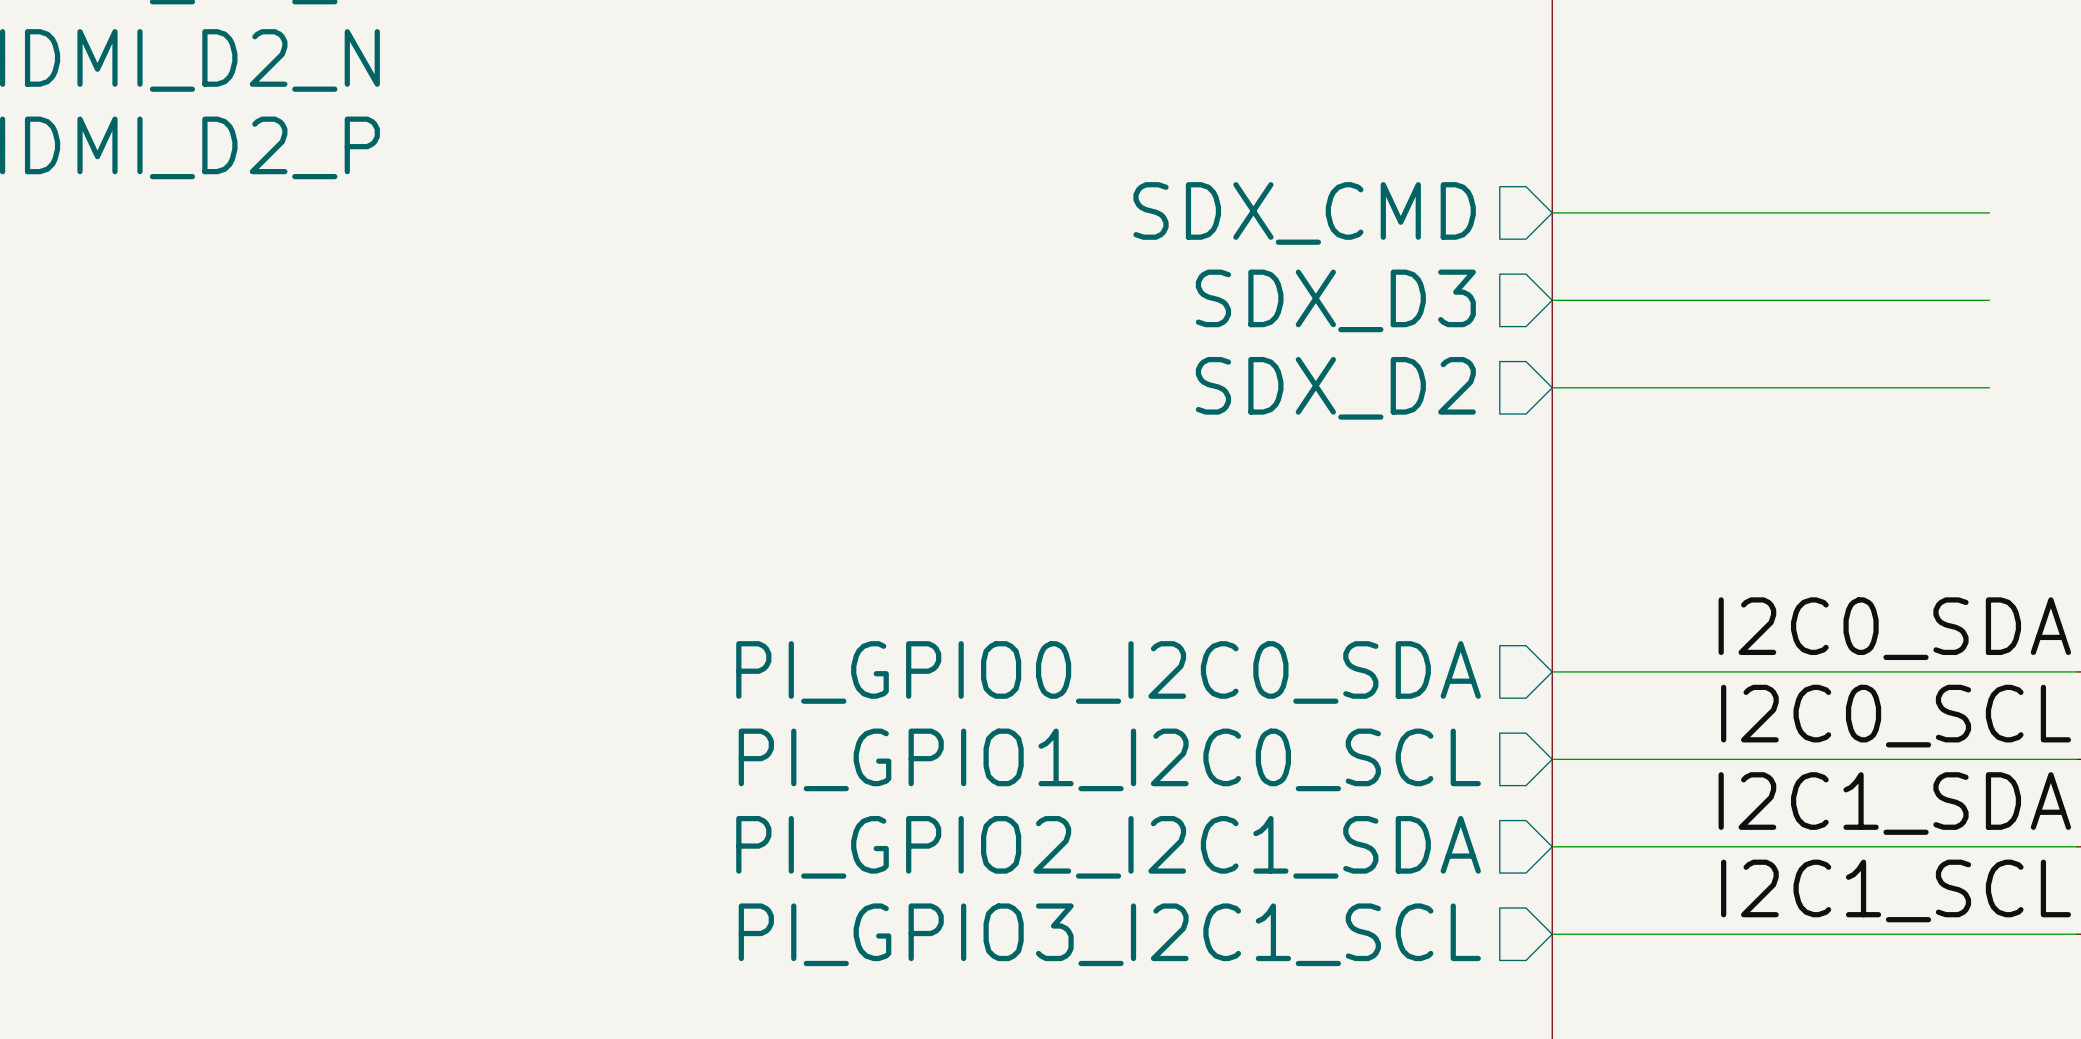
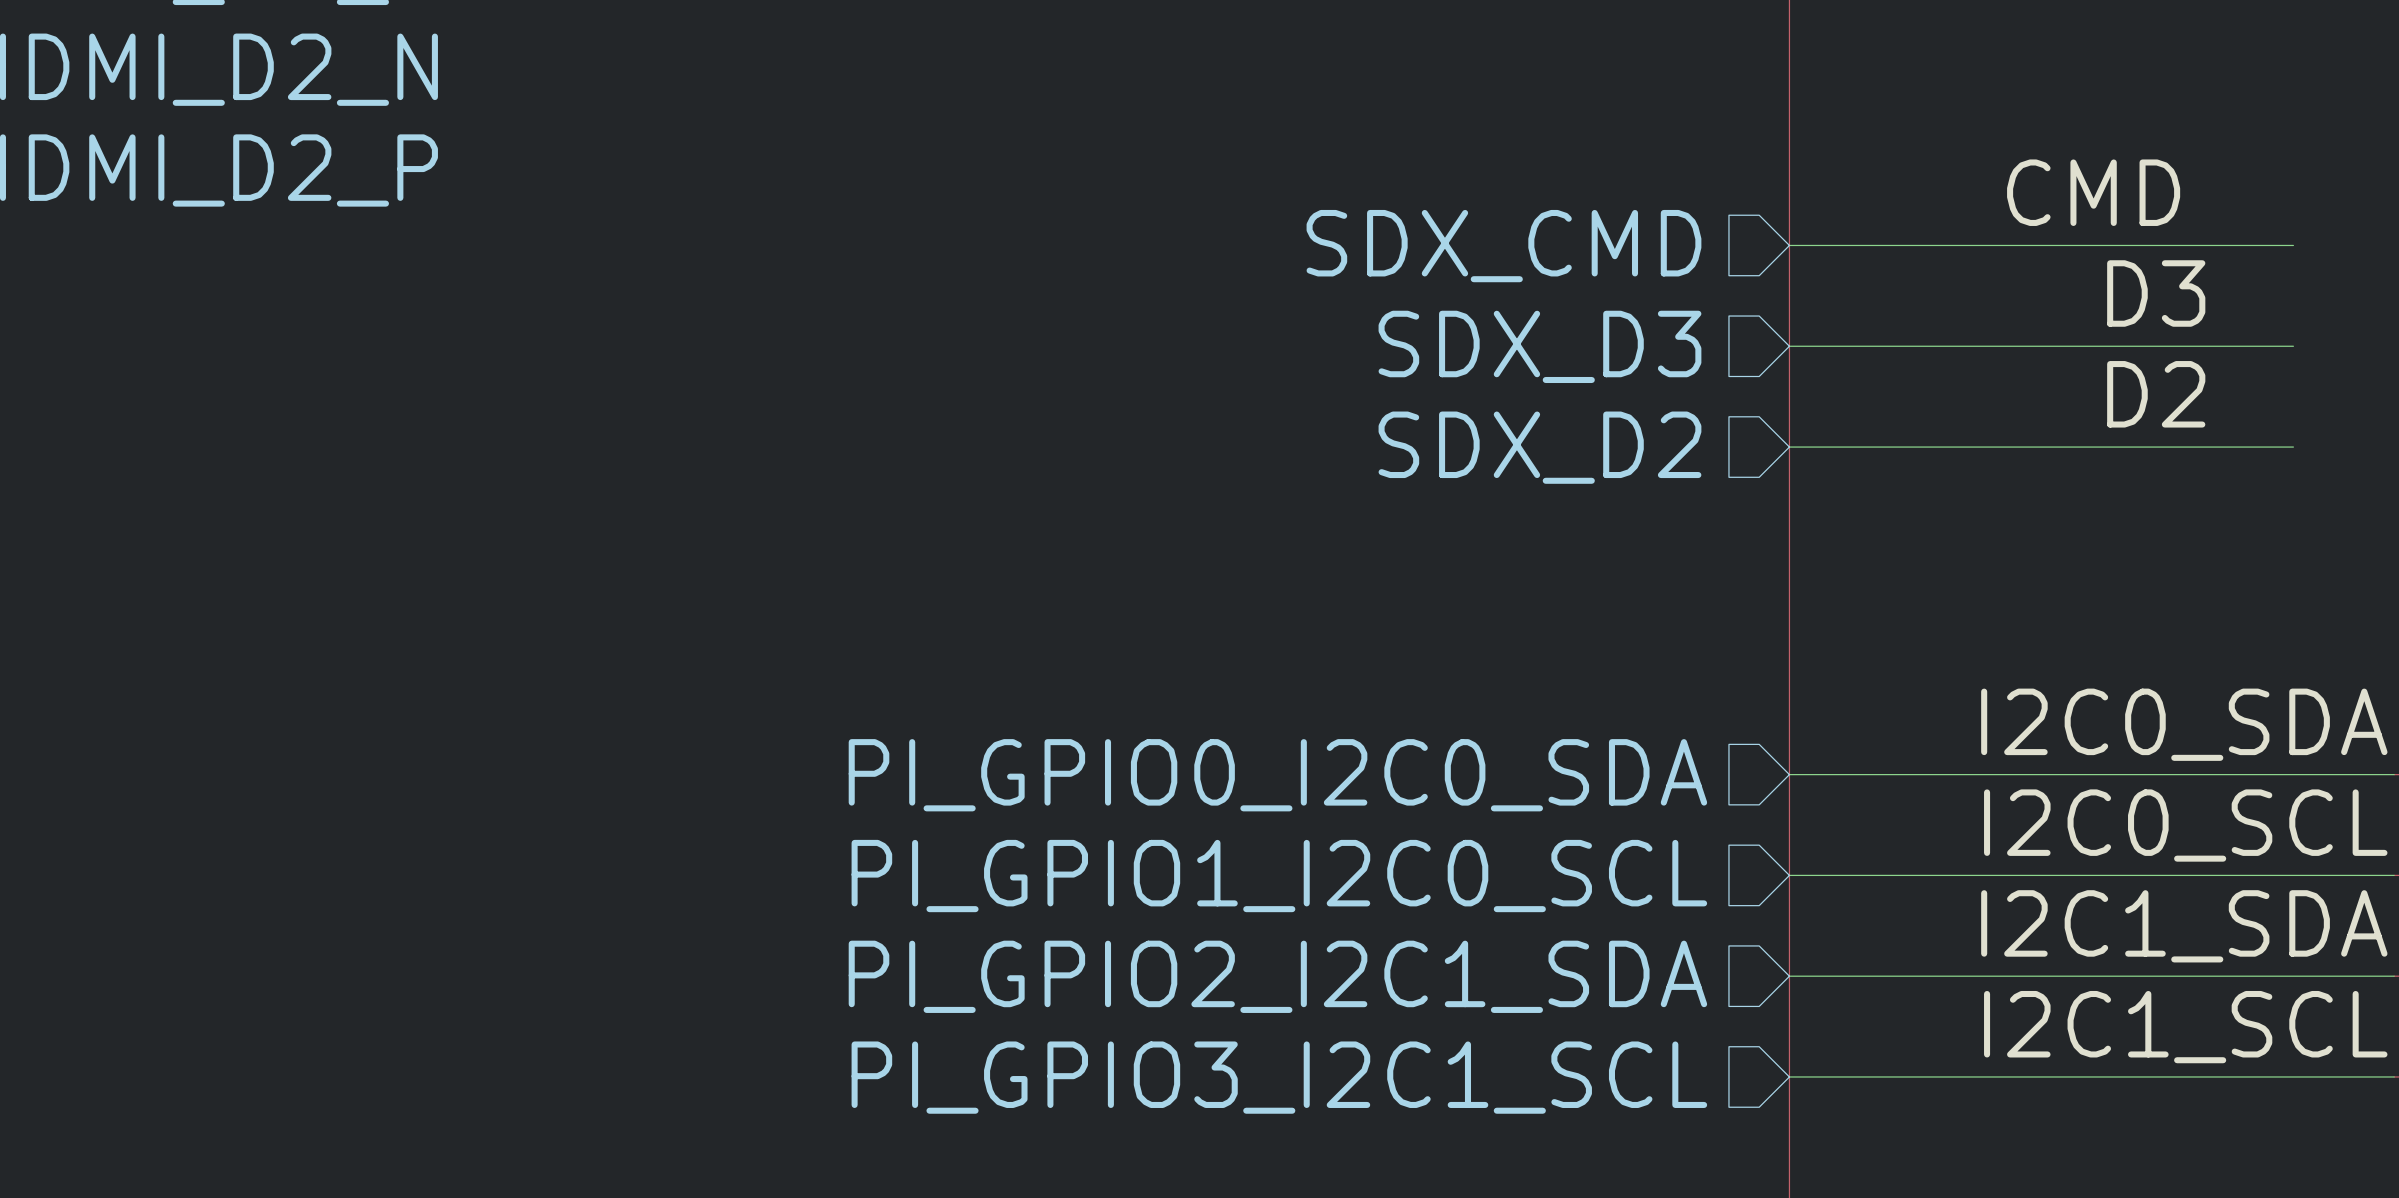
label: none -> CMD (2093, 192)
label: none -> D3 (2156, 293)
label: none -> D2 (2156, 394)

